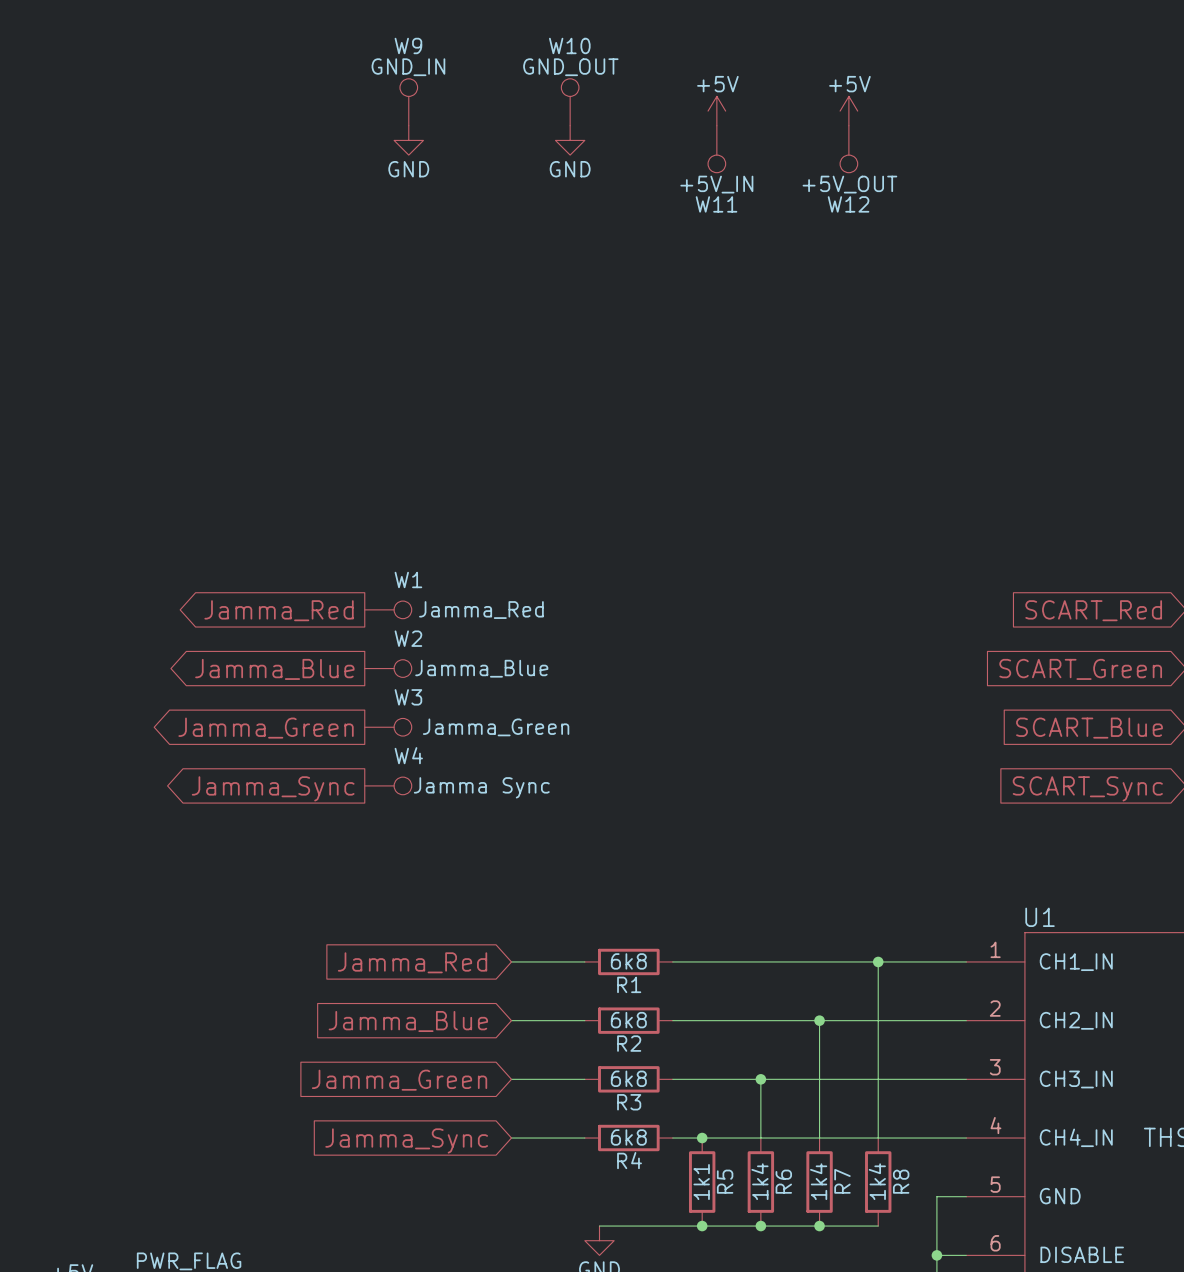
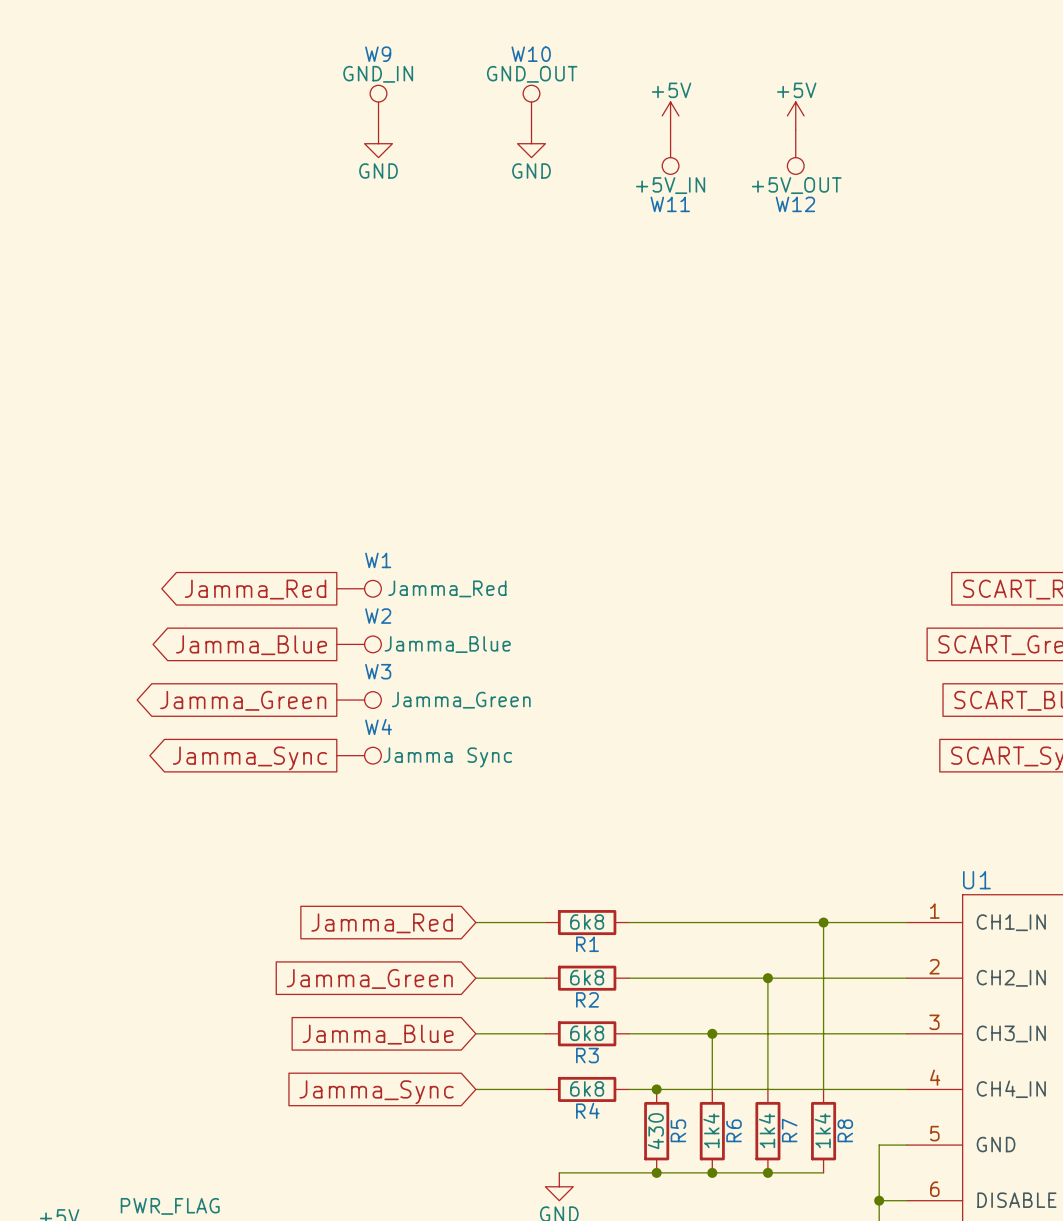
global label: Jamma_Blue (408, 1021) -> Jamma_Green (369, 978)
global label: Jamma_Green (399, 1080) -> Jamma_Blue (378, 1034)
R5 value: 1k1 (701, 1182) -> 430 (655, 1131)

